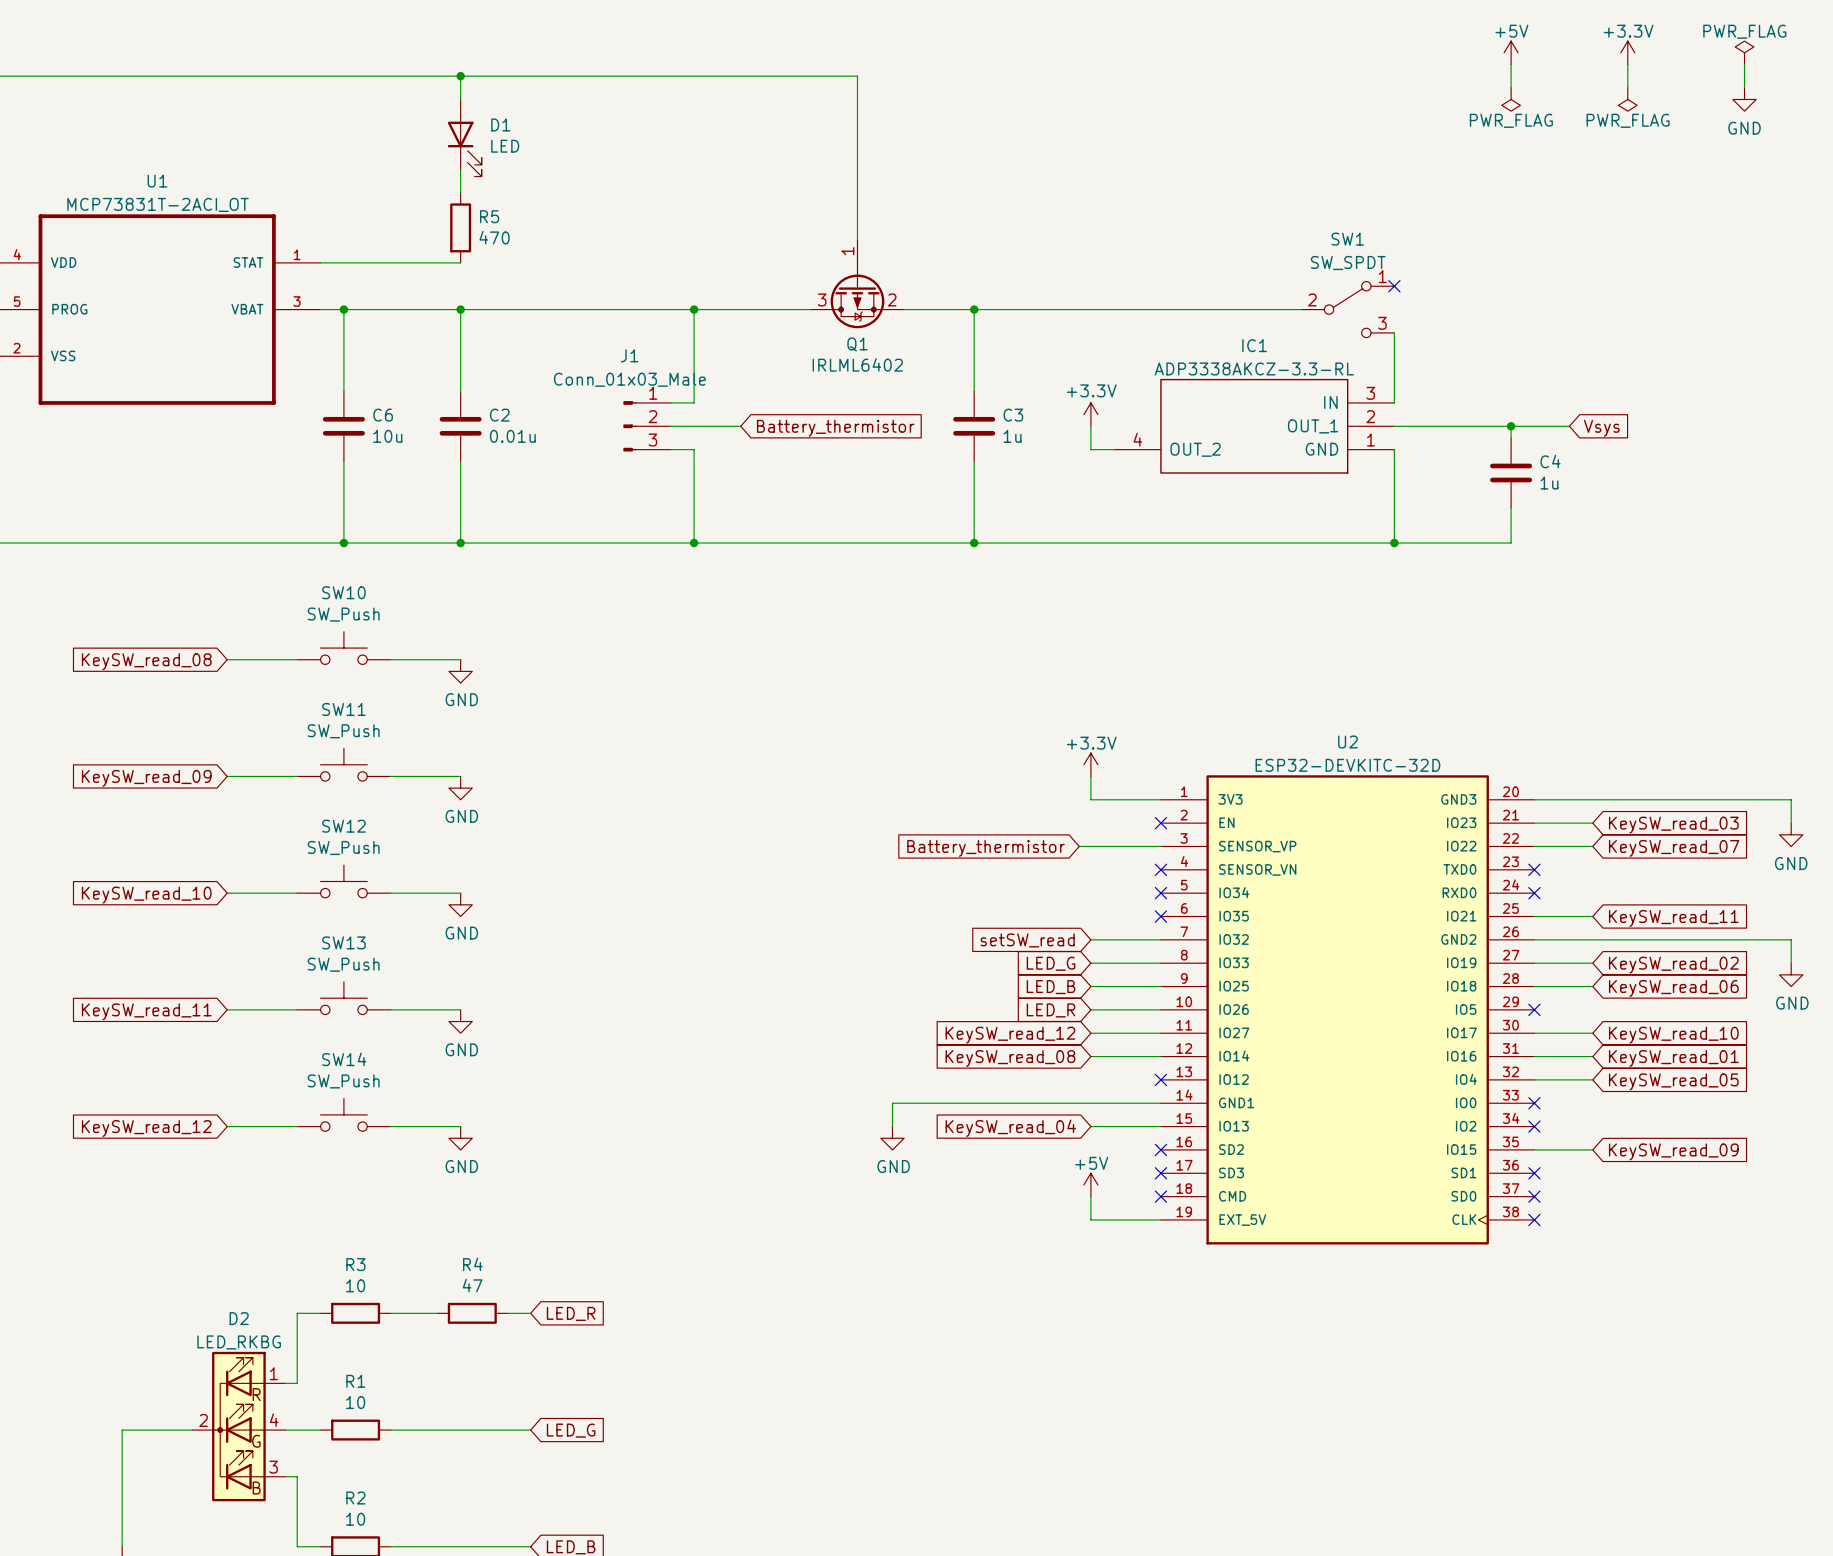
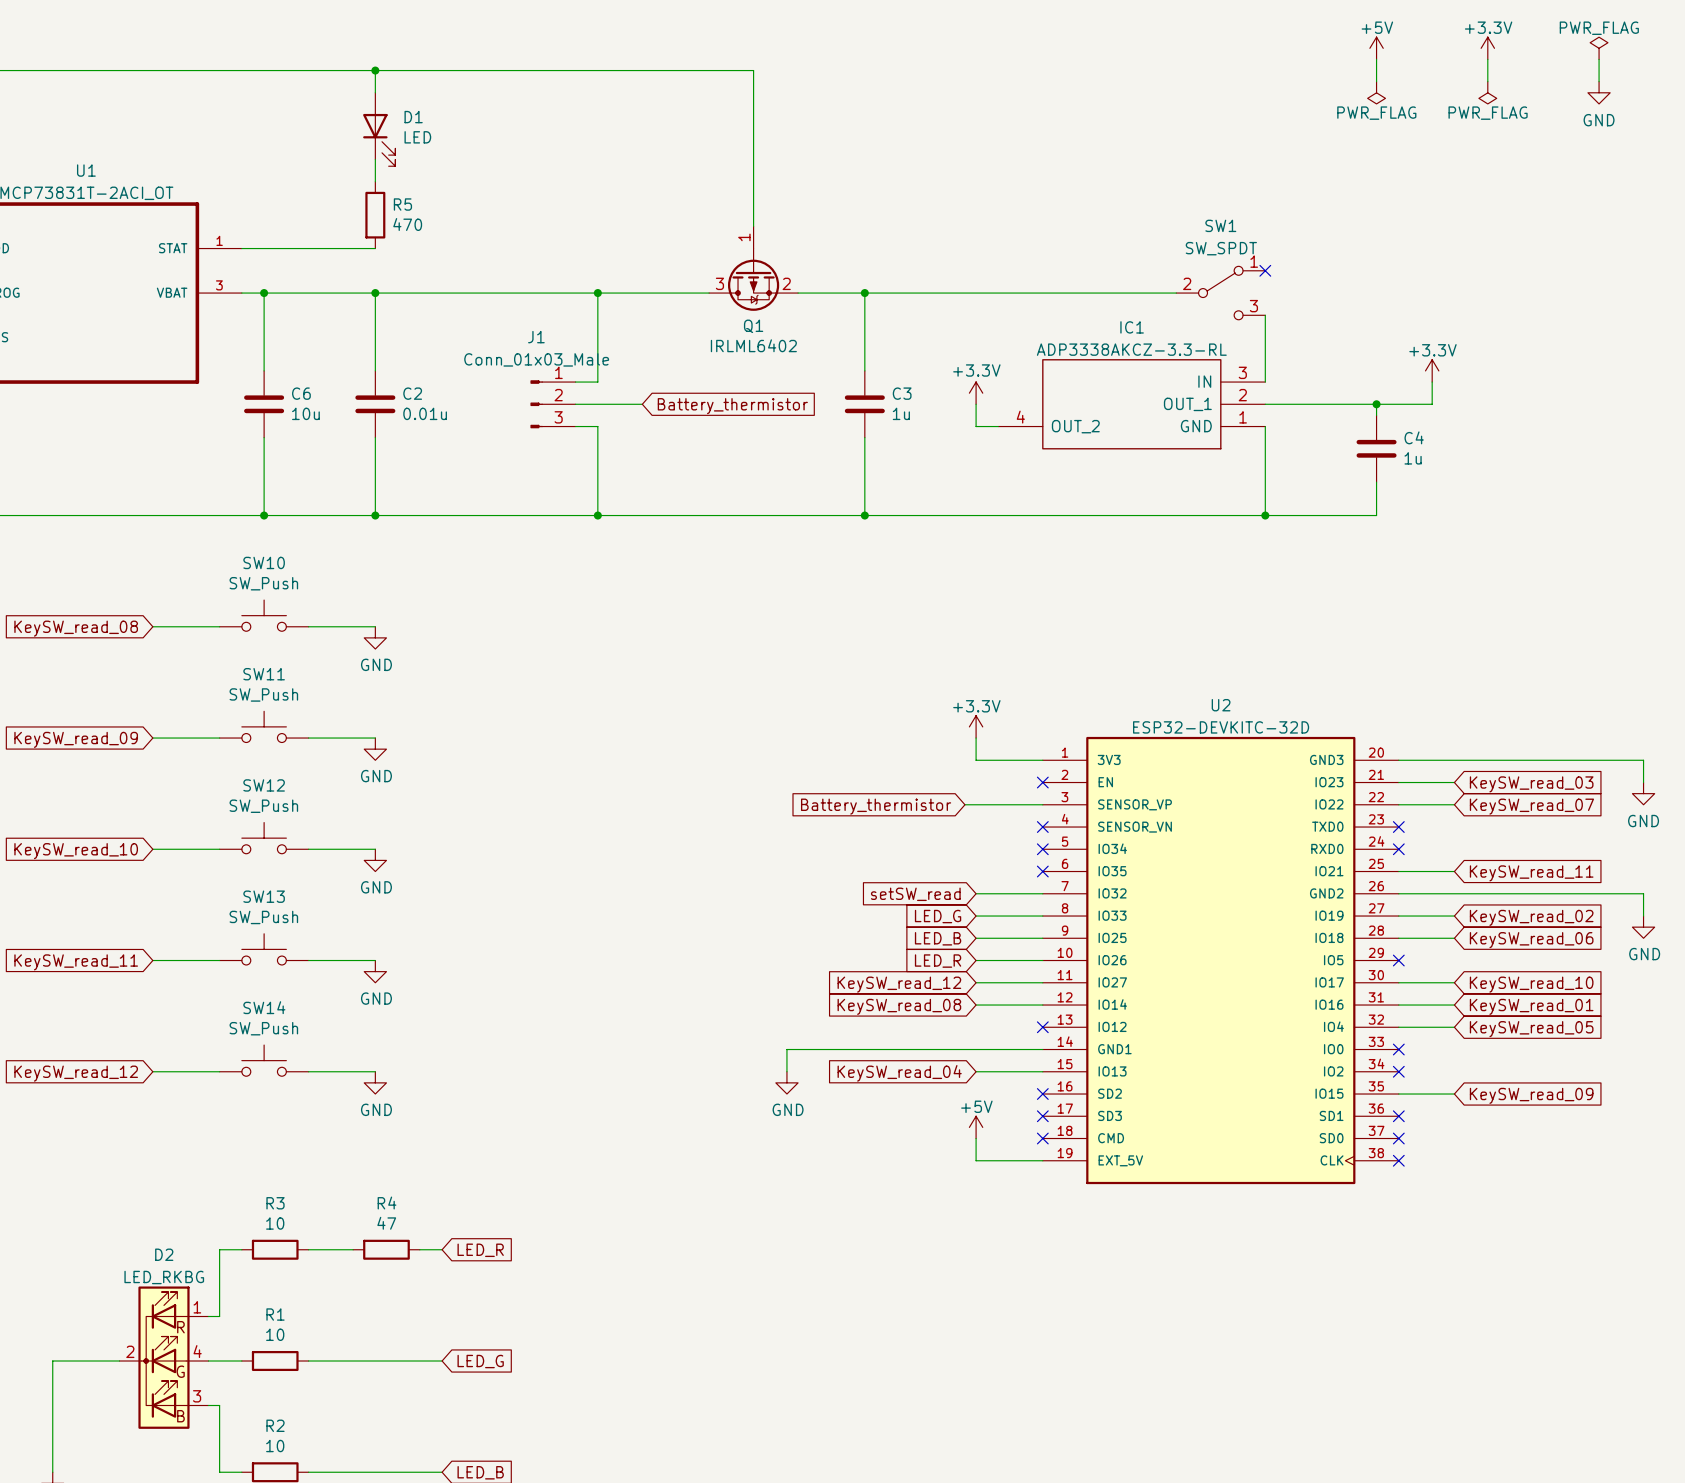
power symbol: none -> +3.3V (1432, 370)
wire: none -> (1432, 382) (1432, 404)
global label: Vsys (1601, 428) -> none

